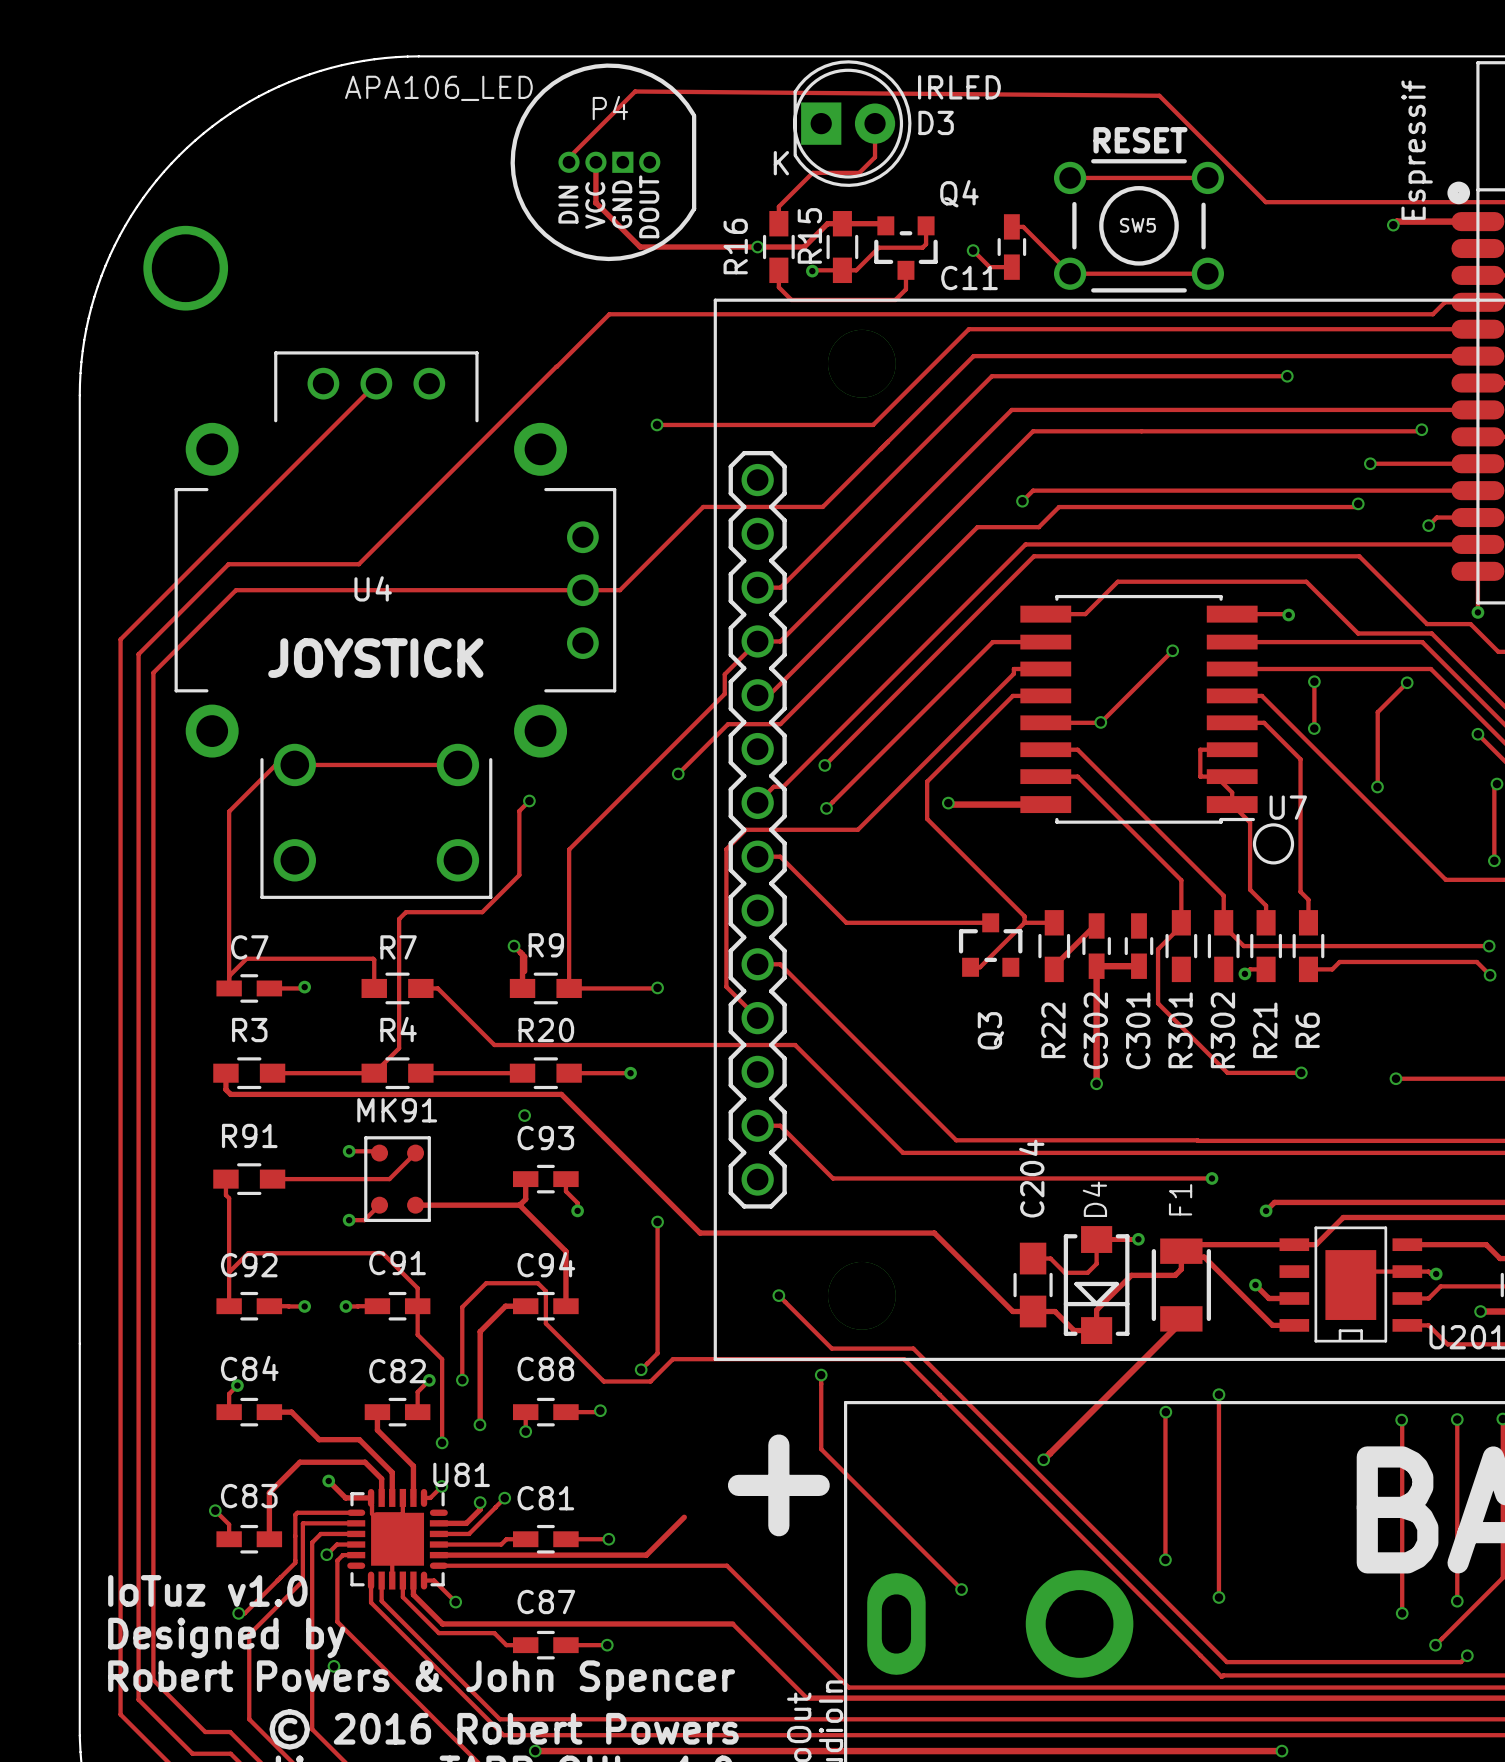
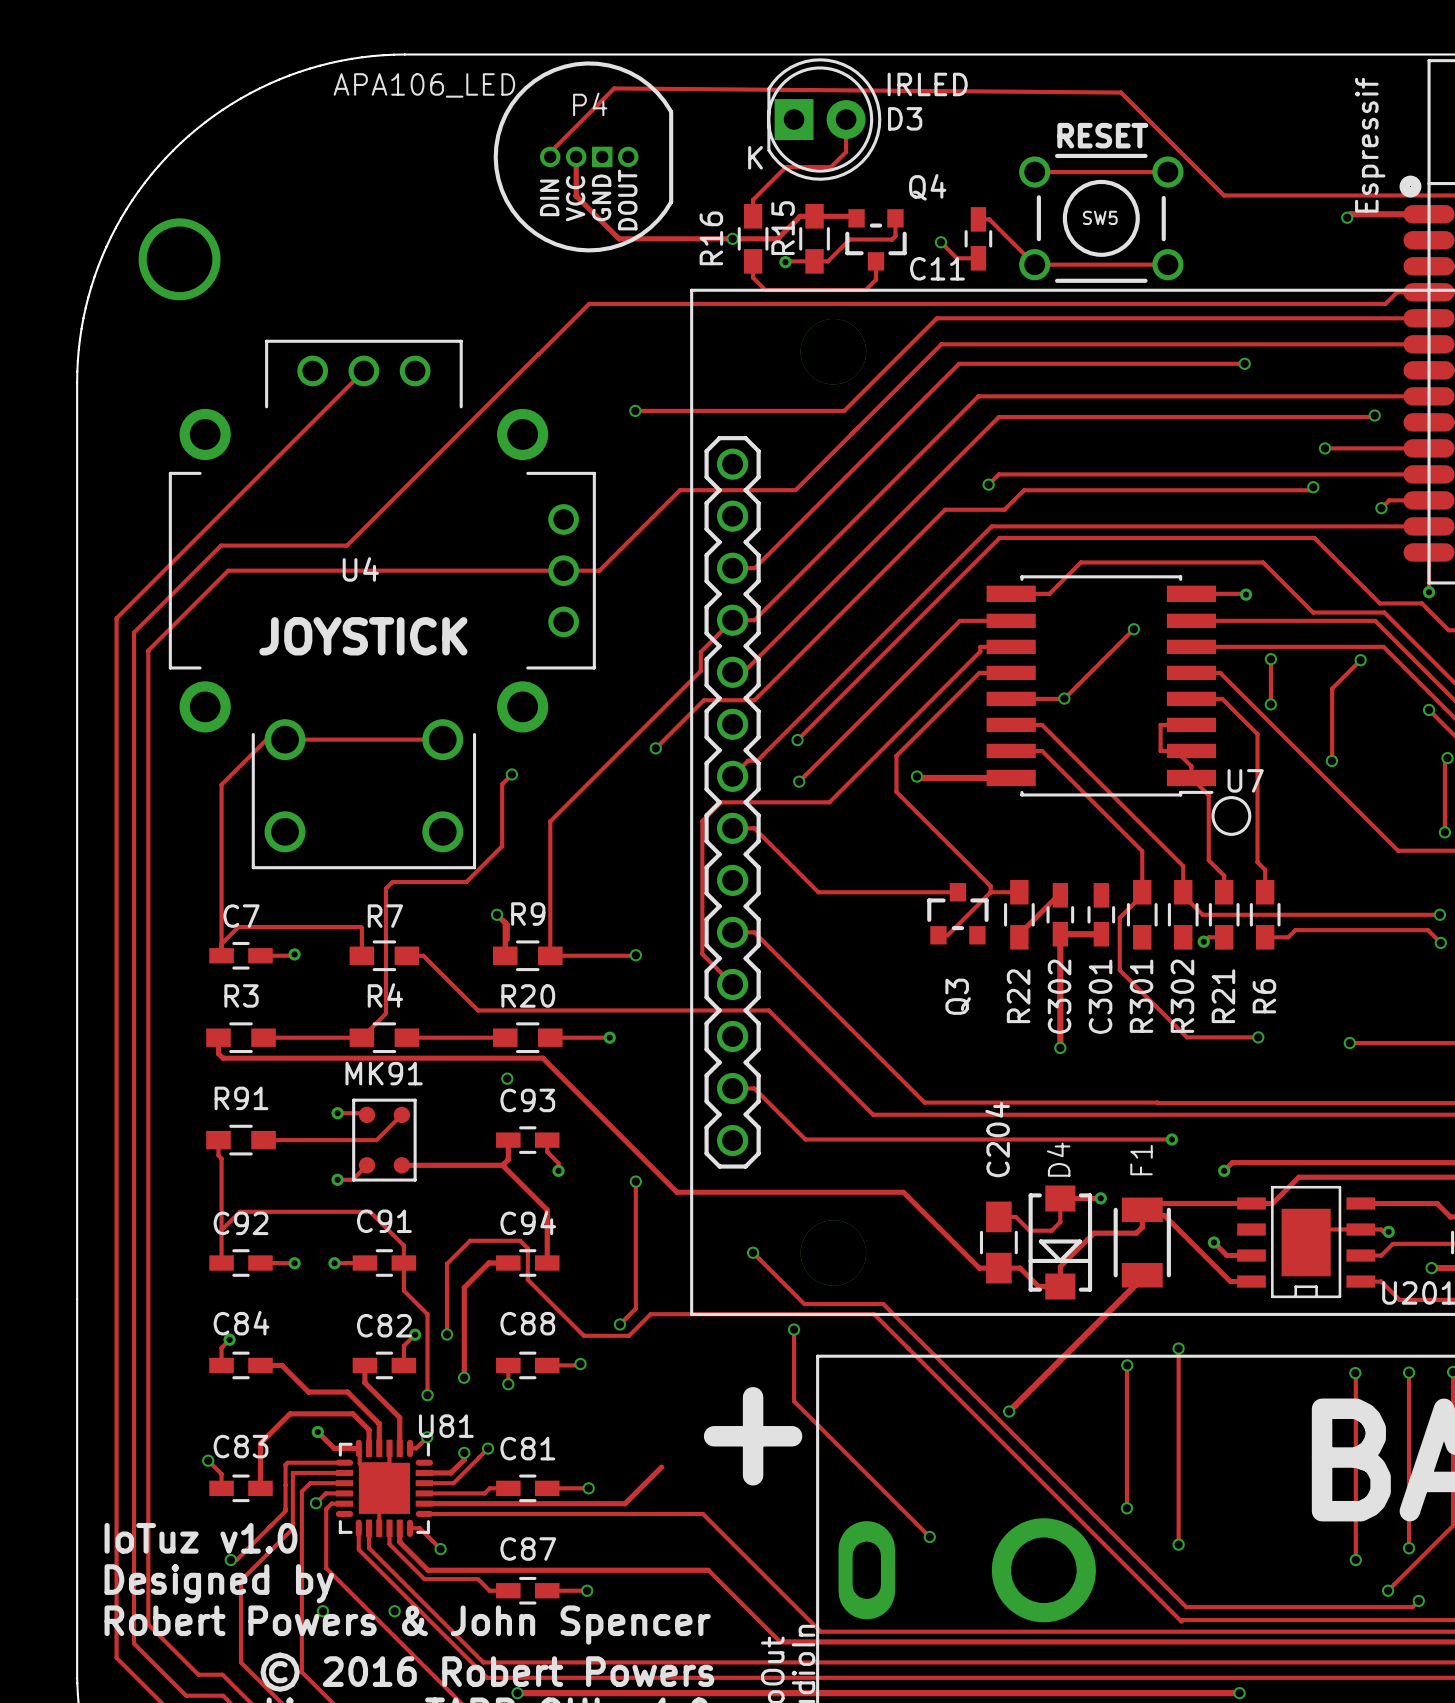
part: none -> (394, 1611)

